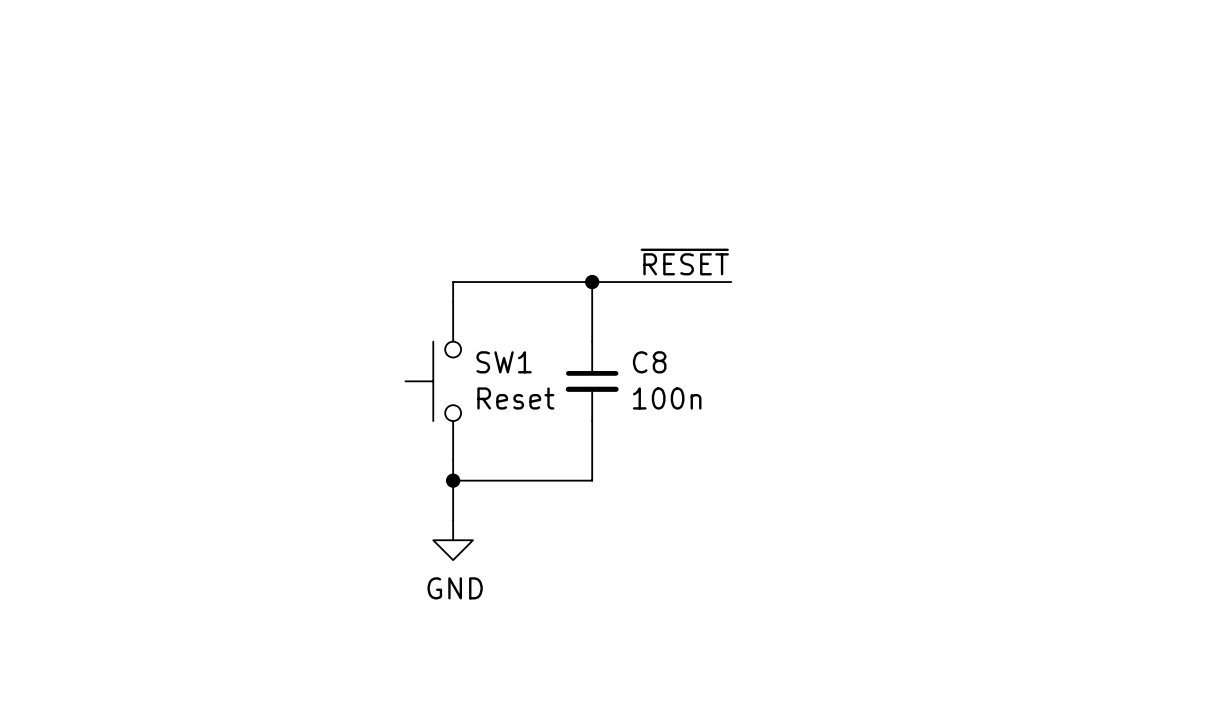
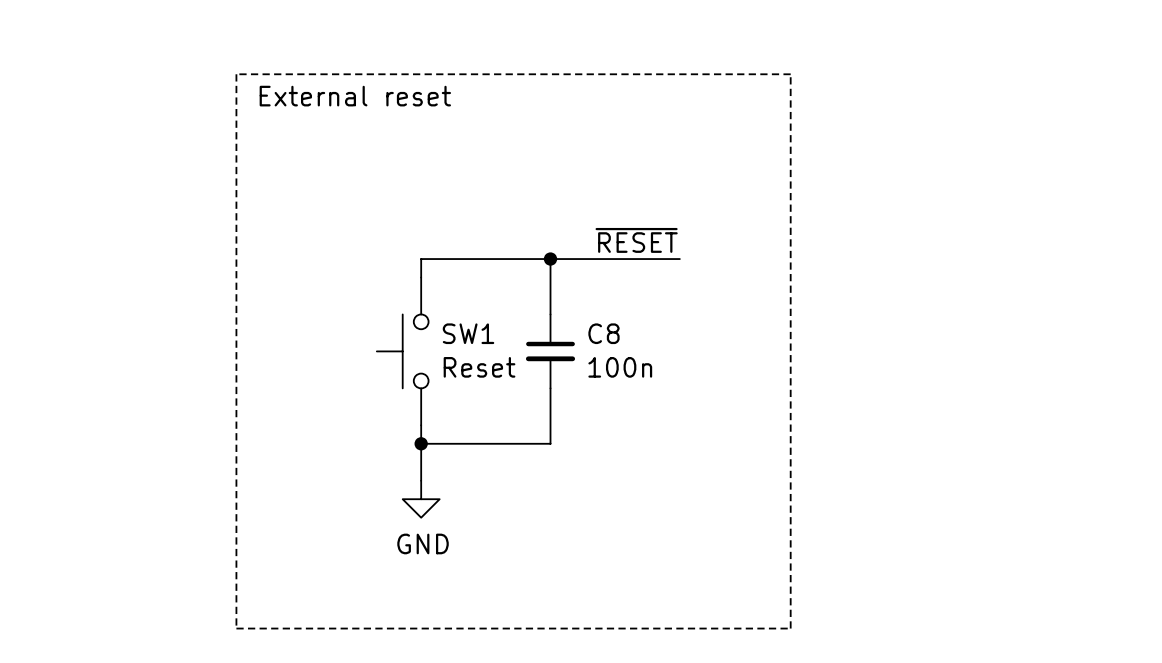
line: none -> (236, 74) (236, 628) (790, 628) (790, 74) (236, 74)
text: none -> External reset (355, 96)

